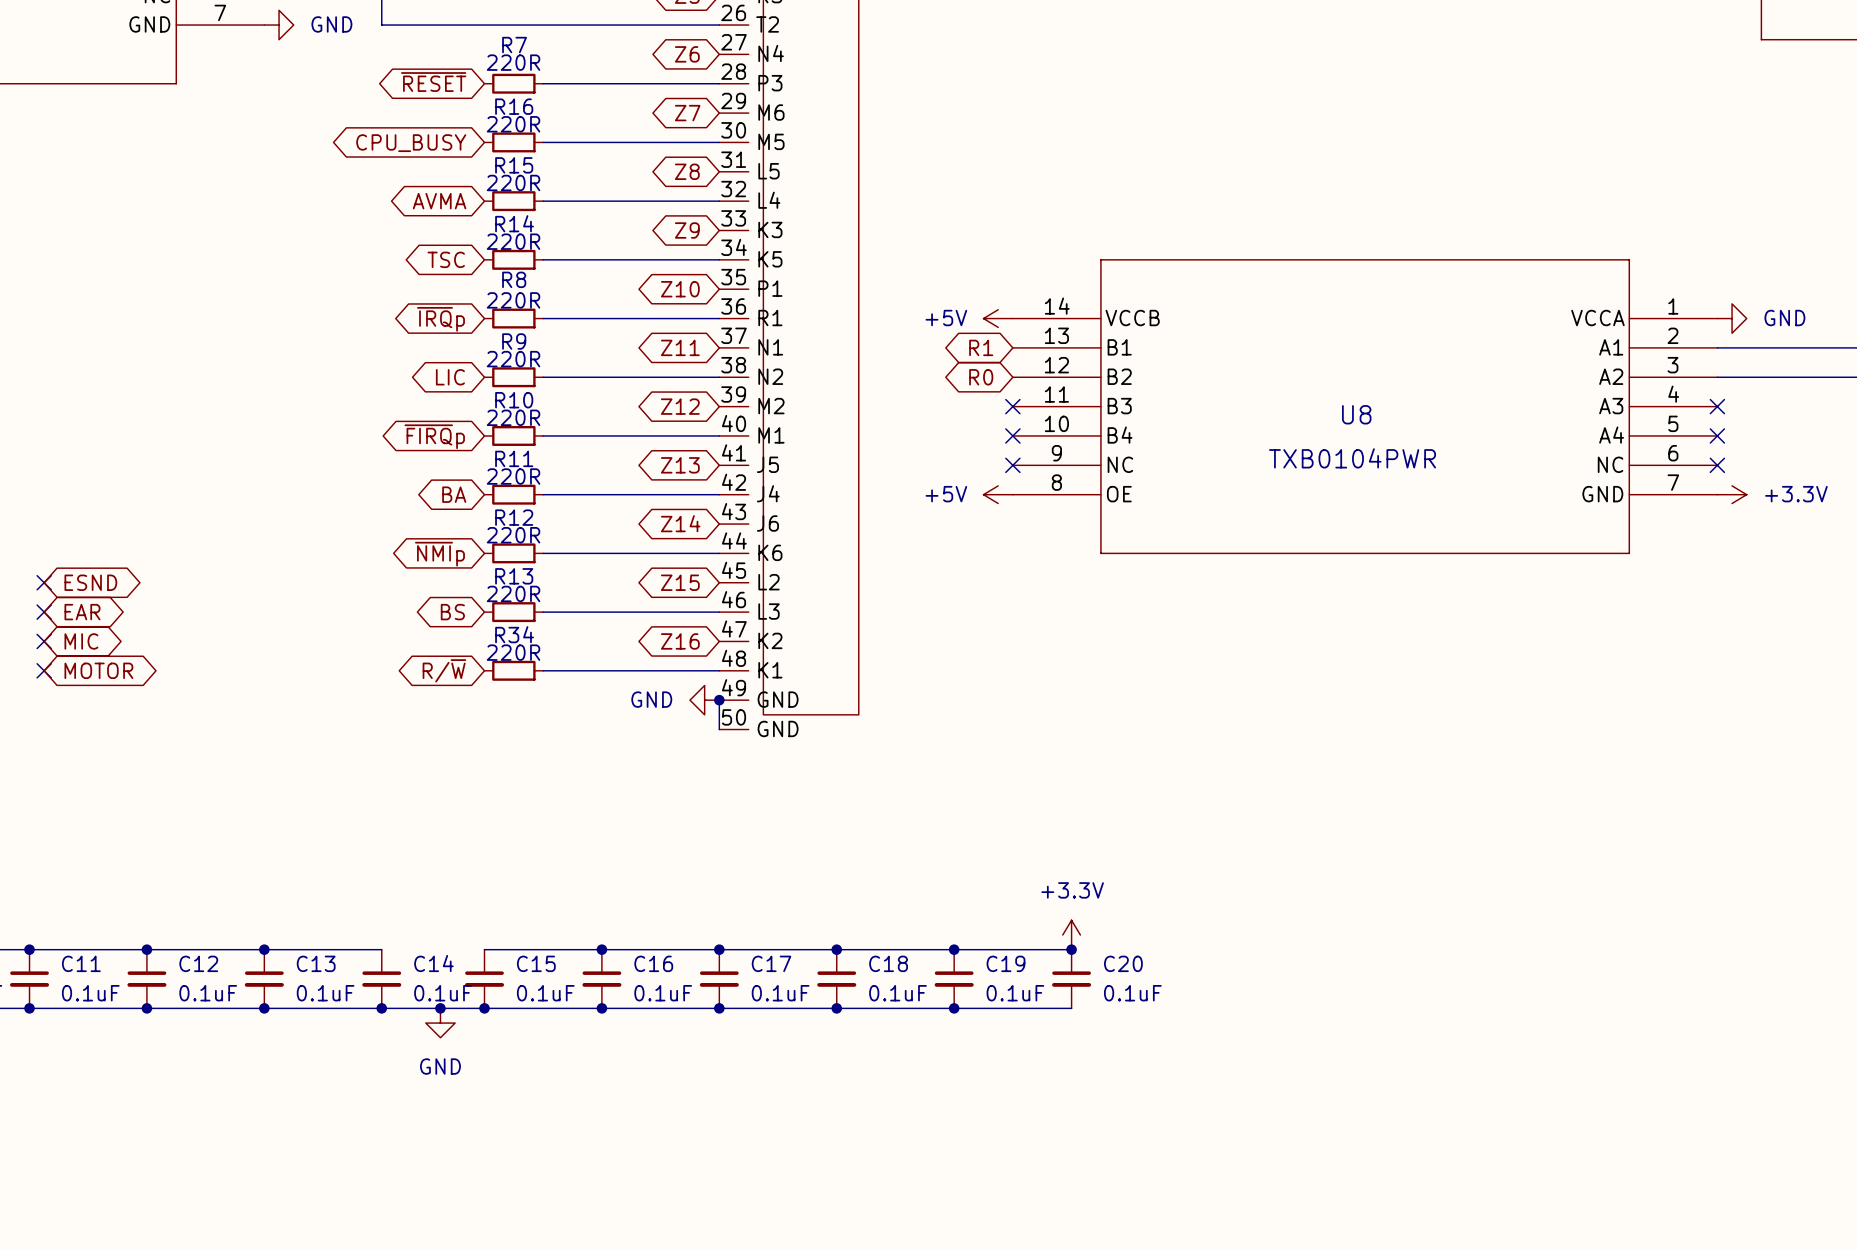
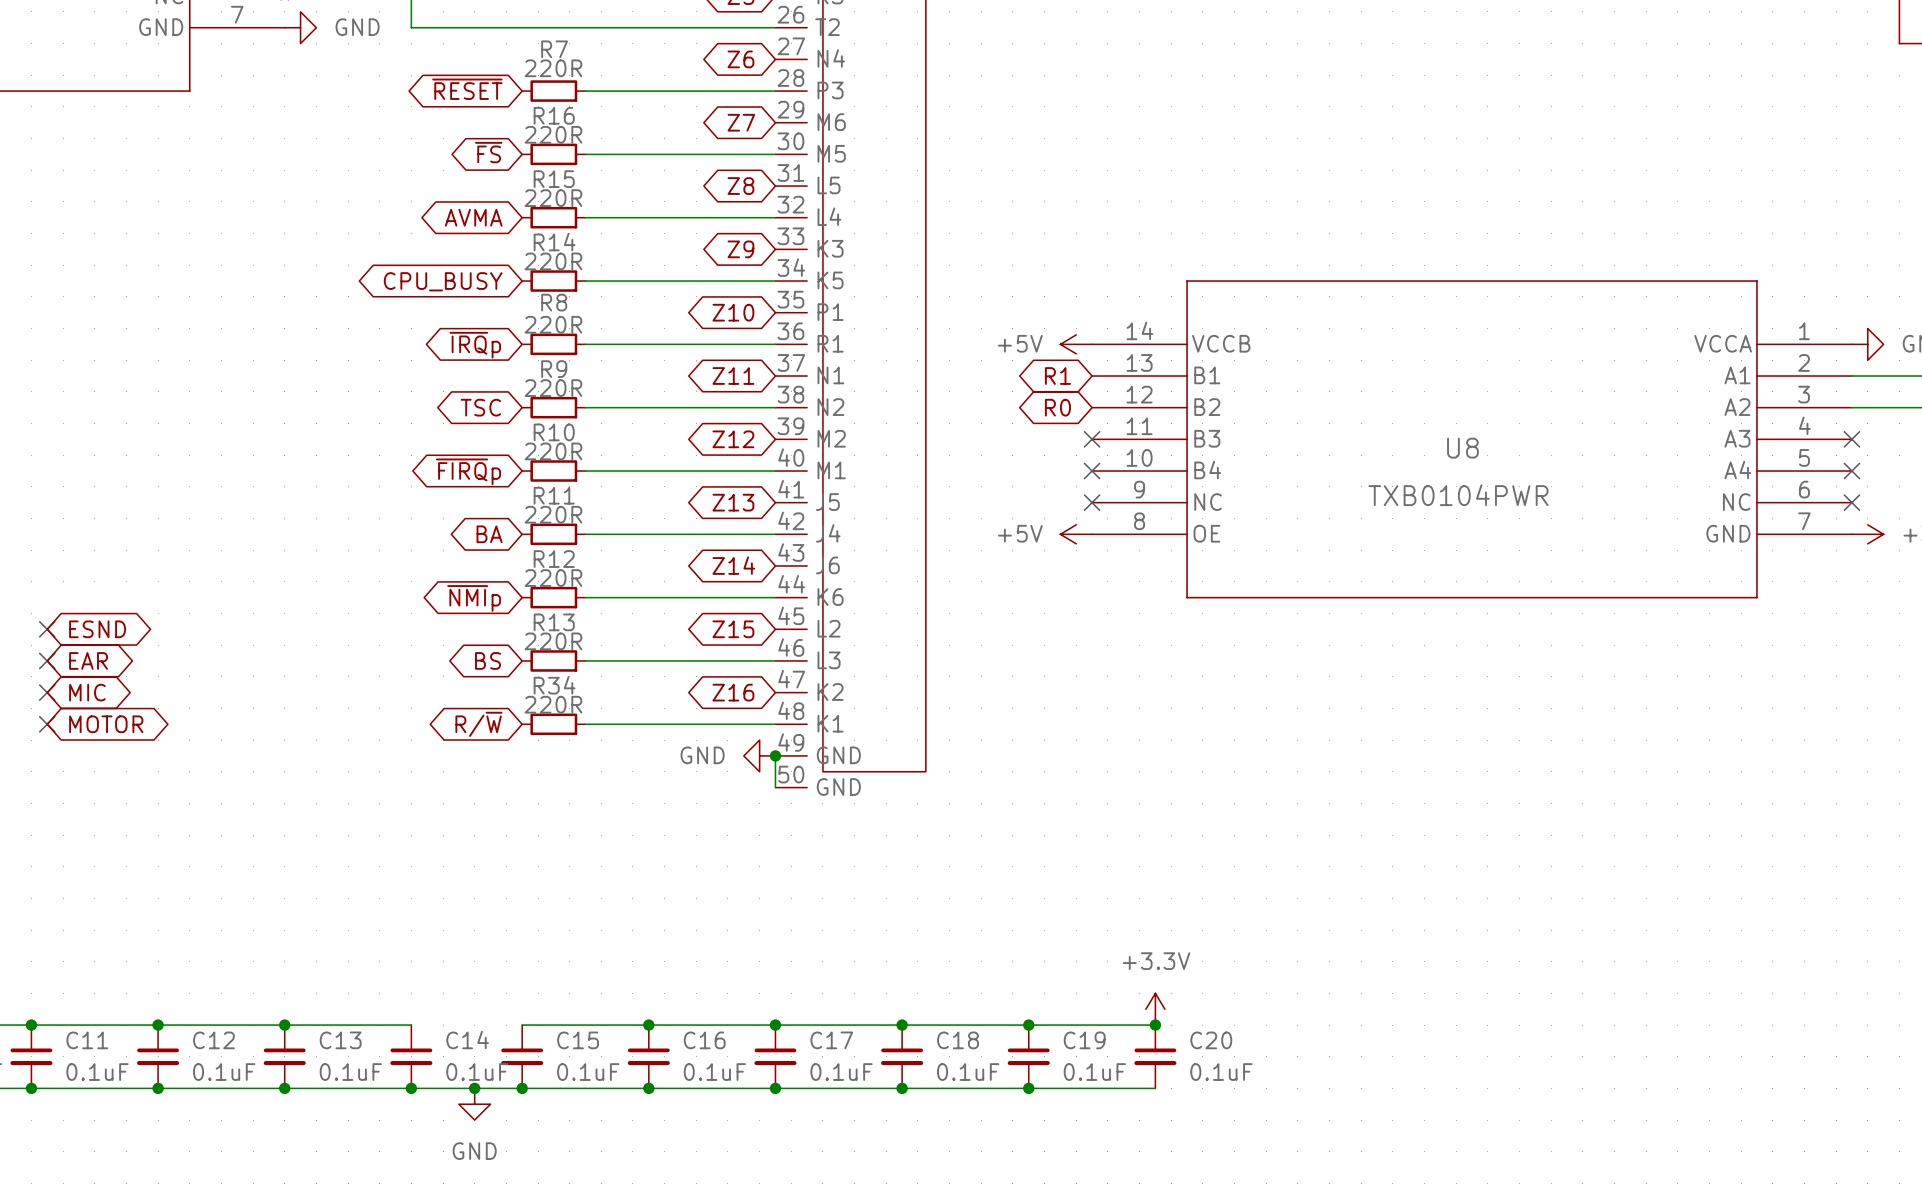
global label: CPU_BUSY (411, 143) -> ~{FS} (488, 152)
global label: TSC (446, 259) -> CPU_BUSY (443, 281)
global label: LIC (450, 377) -> TSC (480, 407)

